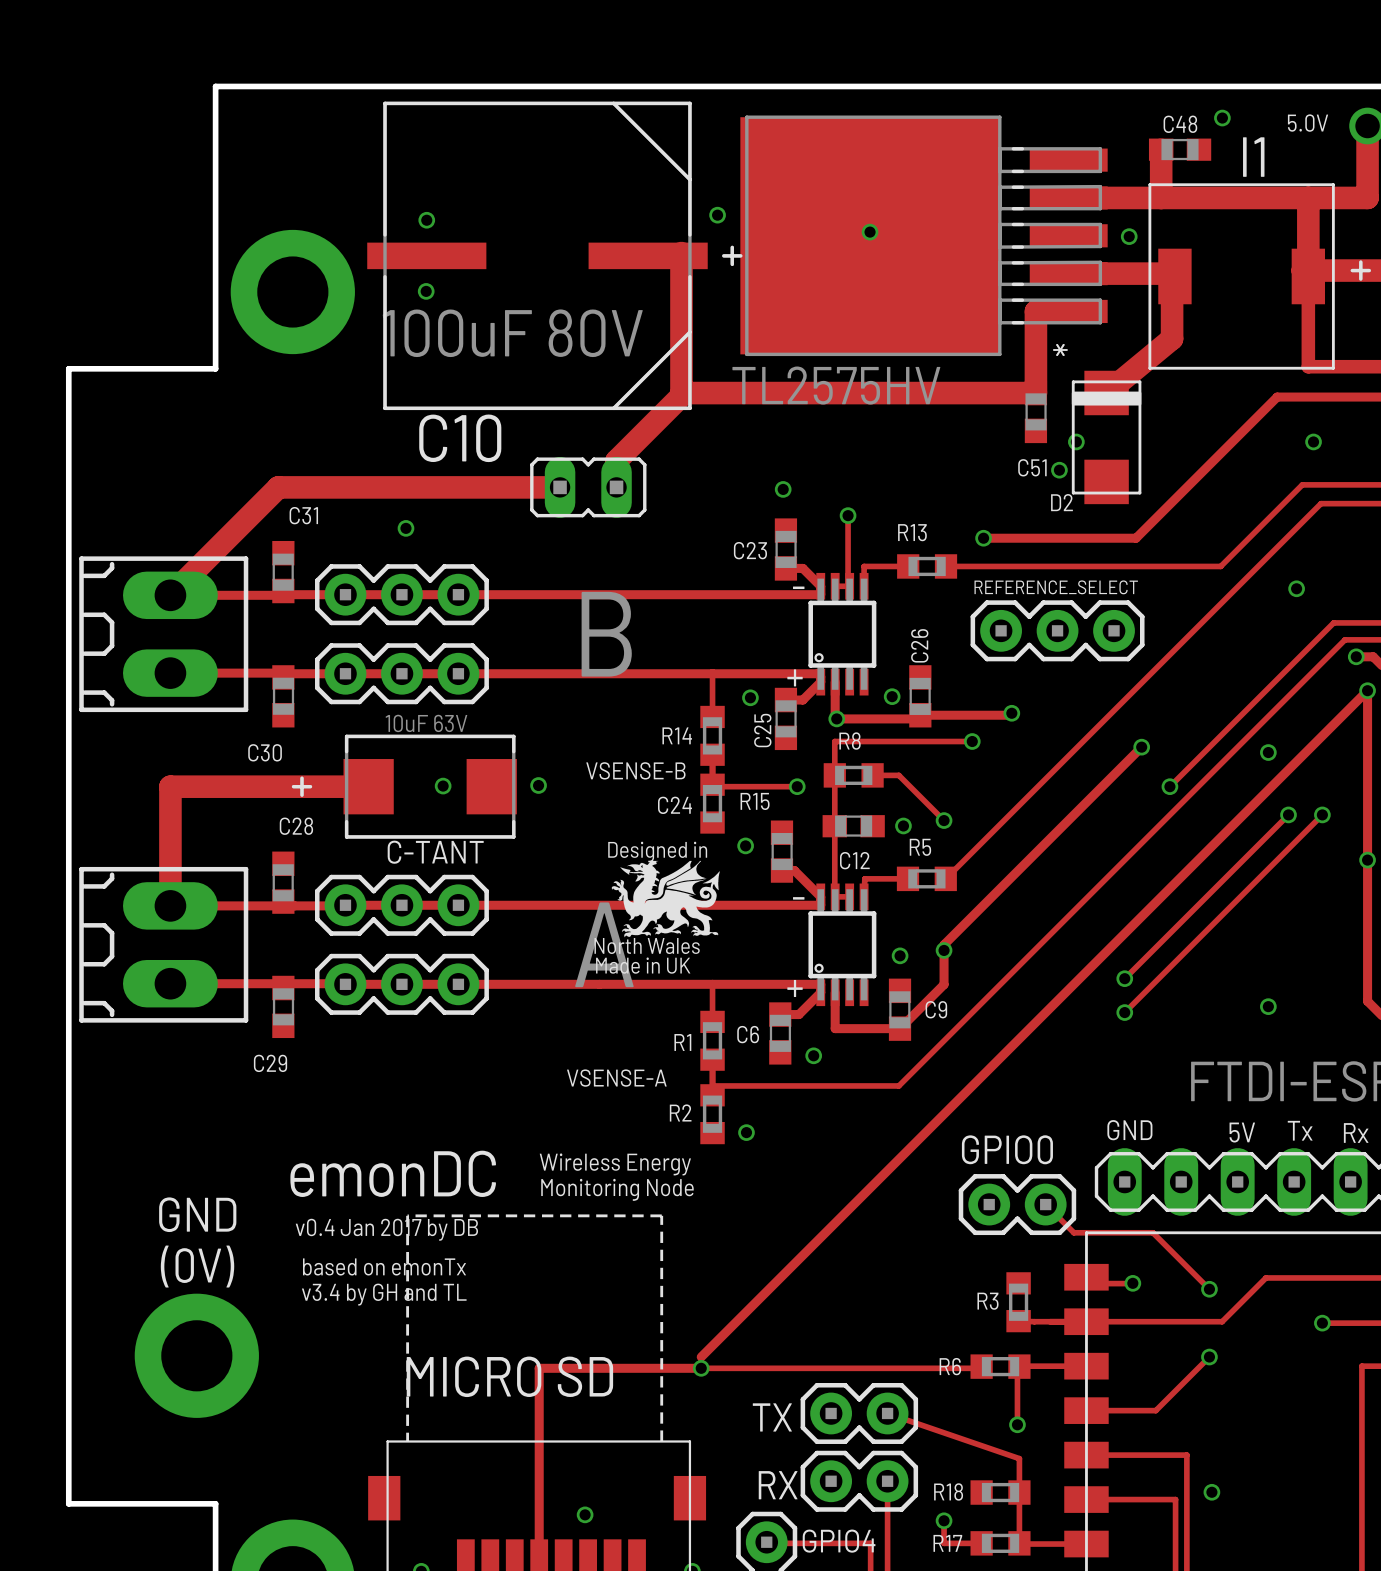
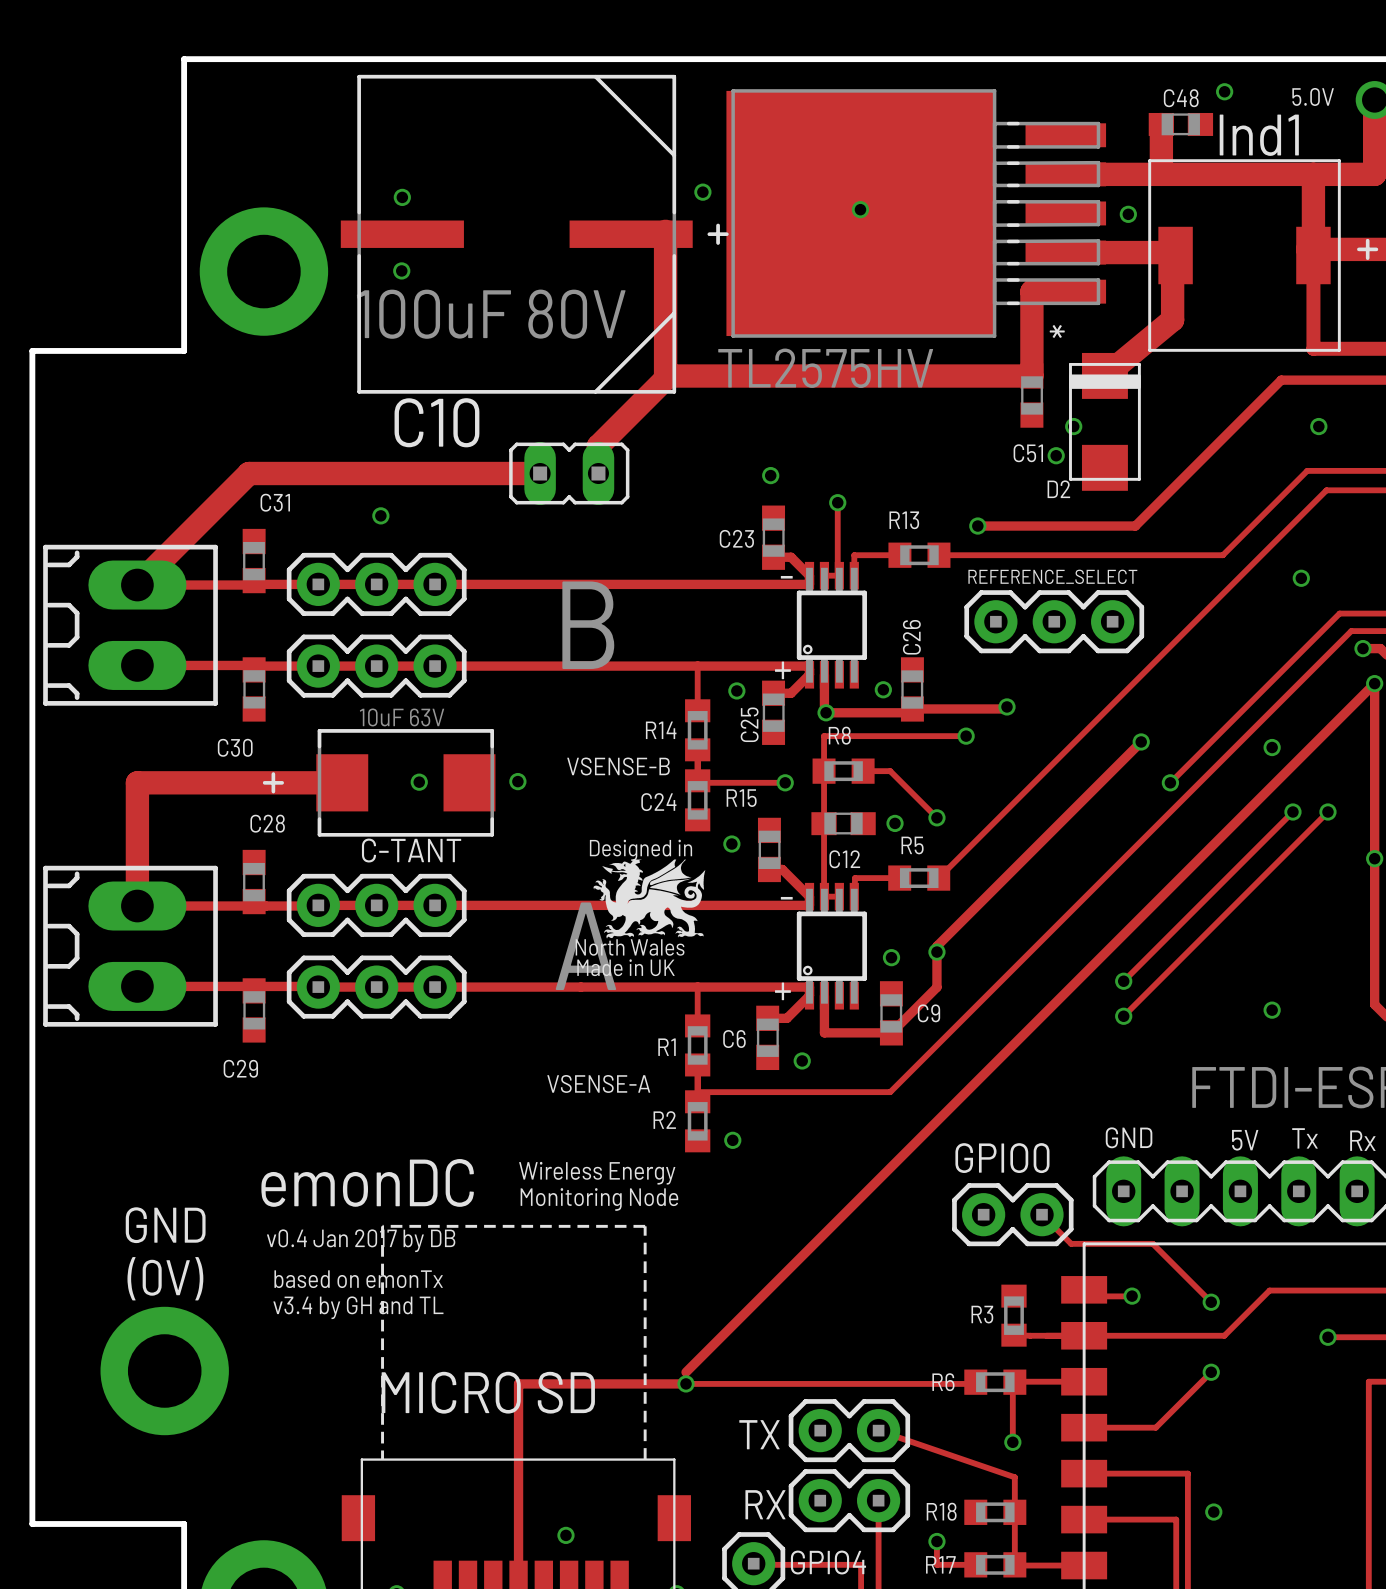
text: I1 (1253, 157) -> Ind1 (1259, 135)

